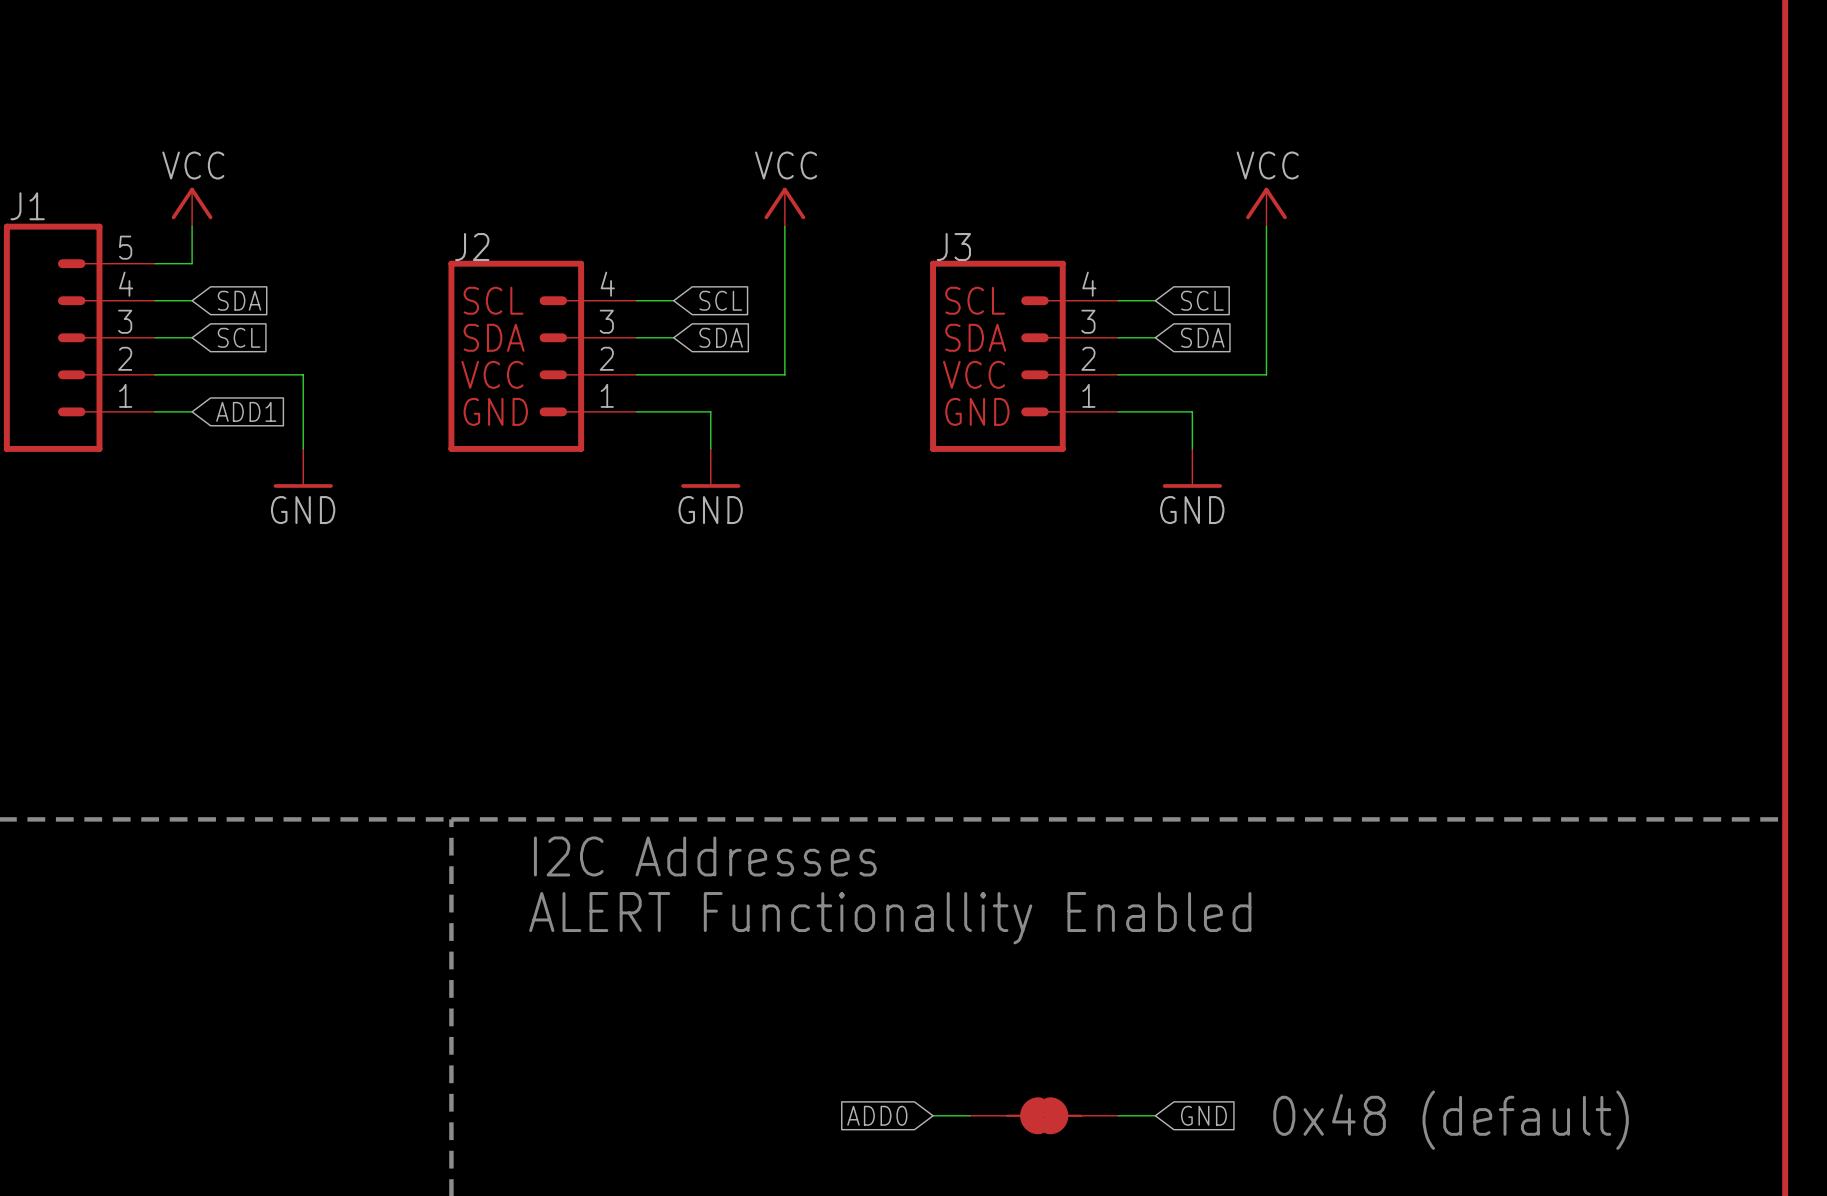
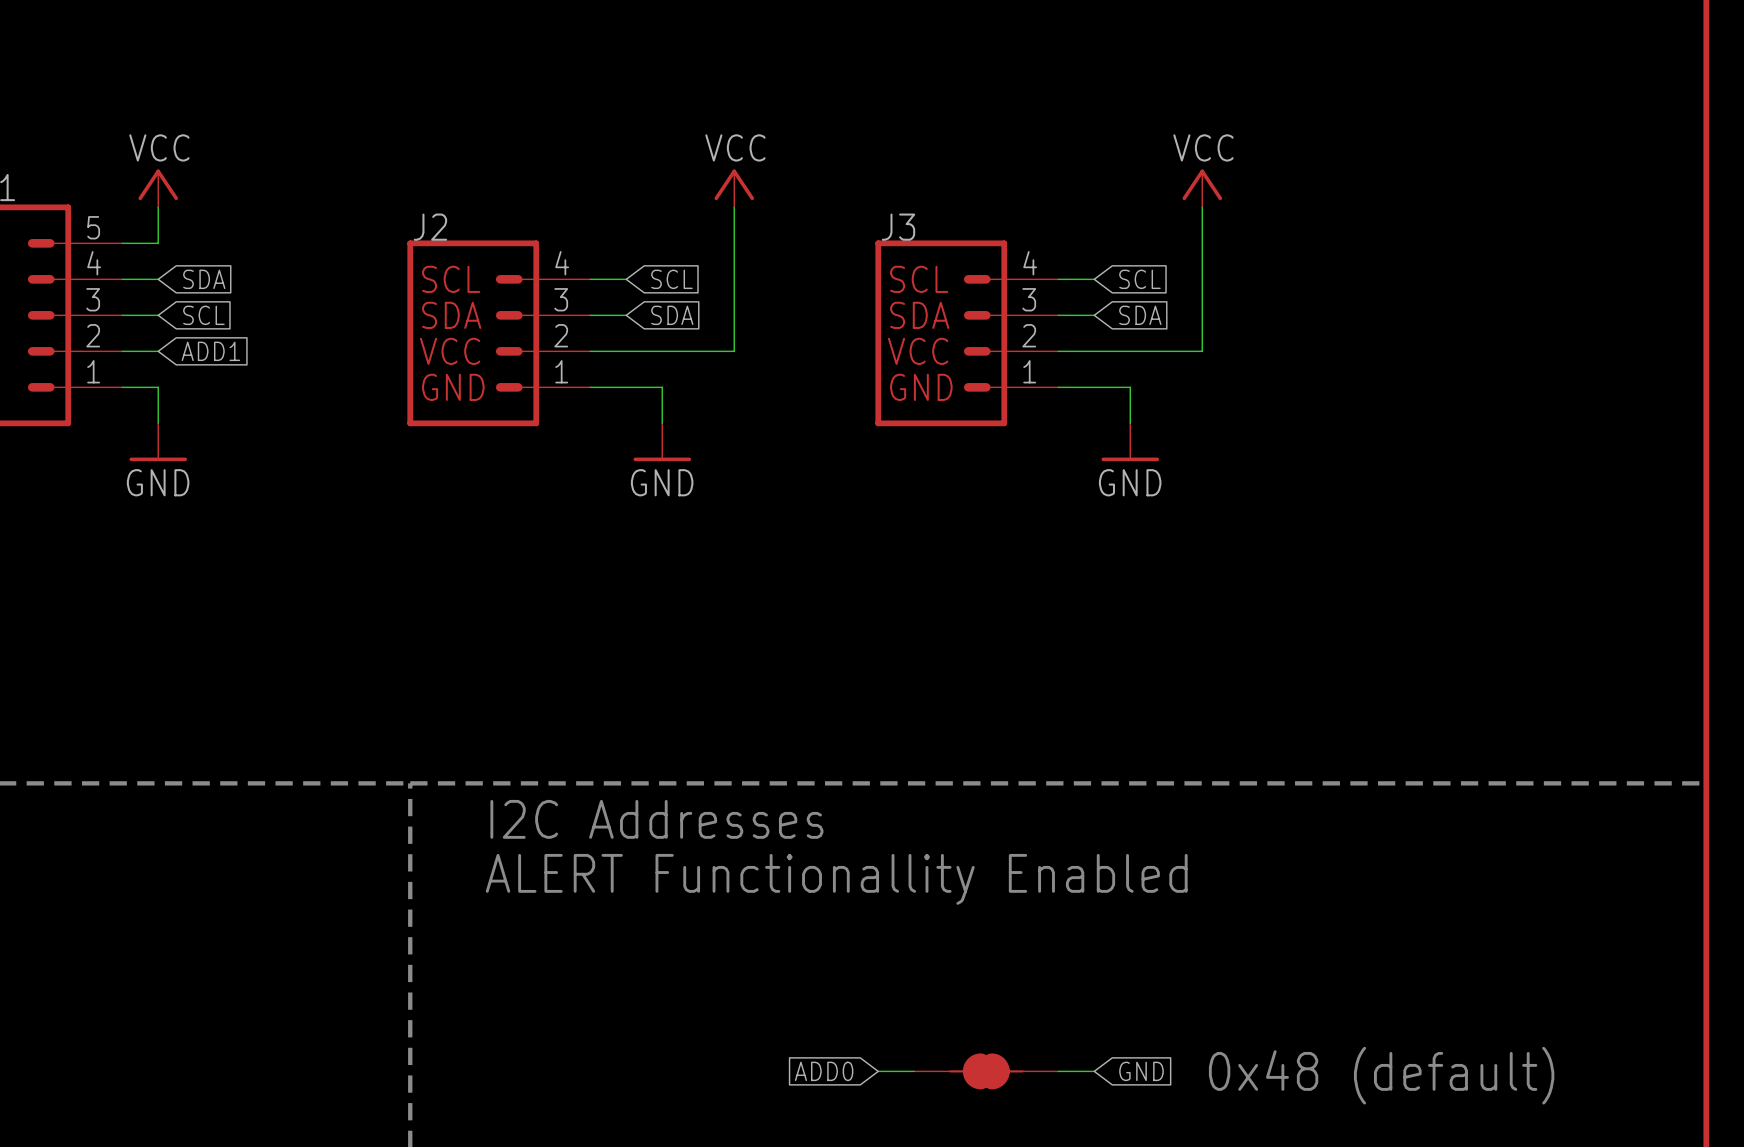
wire: (192, 374) (303, 374) (303, 448) -> none
wire: none -> (158, 387) (158, 423)
global label position: ADD1 (246, 411) -> ADD1 (210, 351)
power symbol position: GND (303, 468) -> GND (158, 442)

